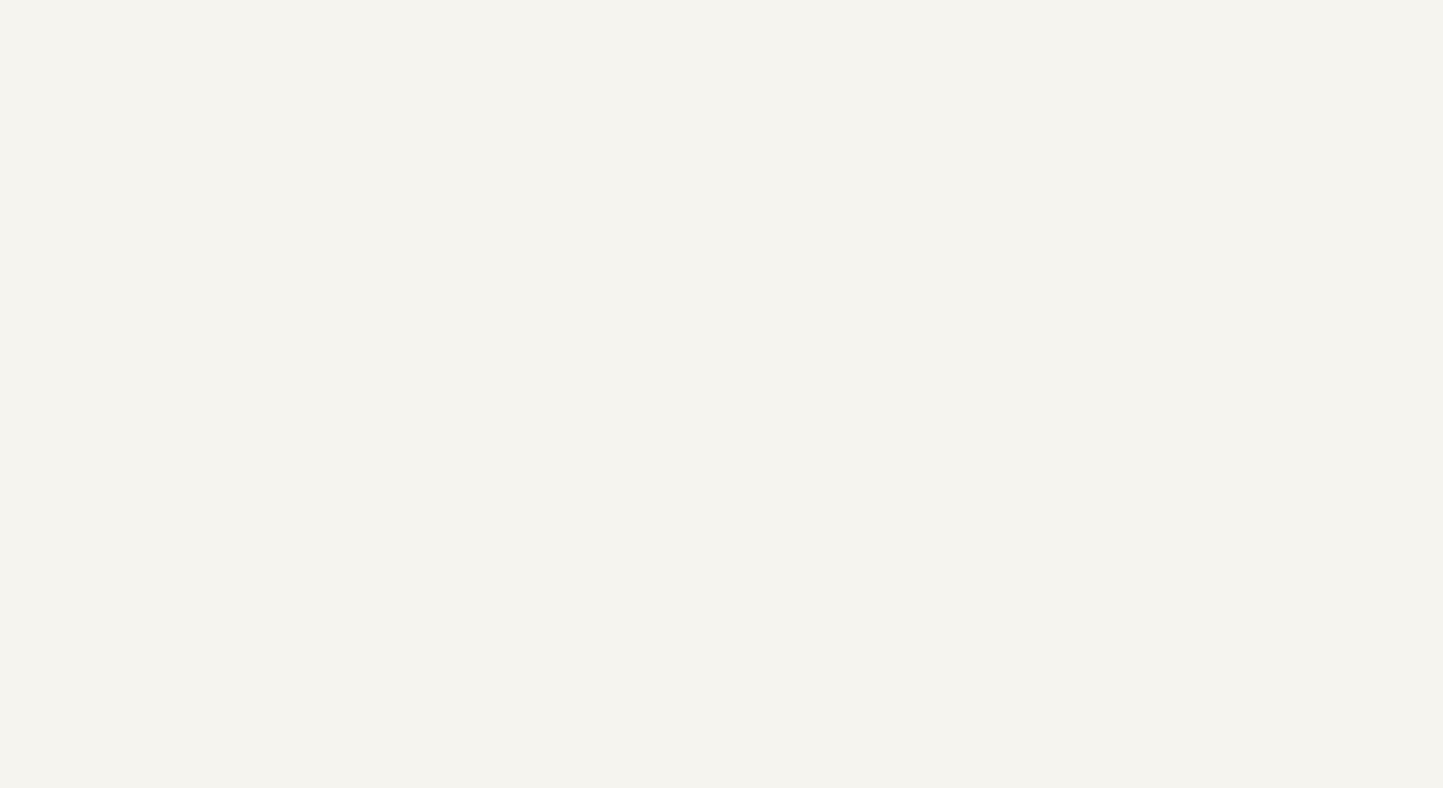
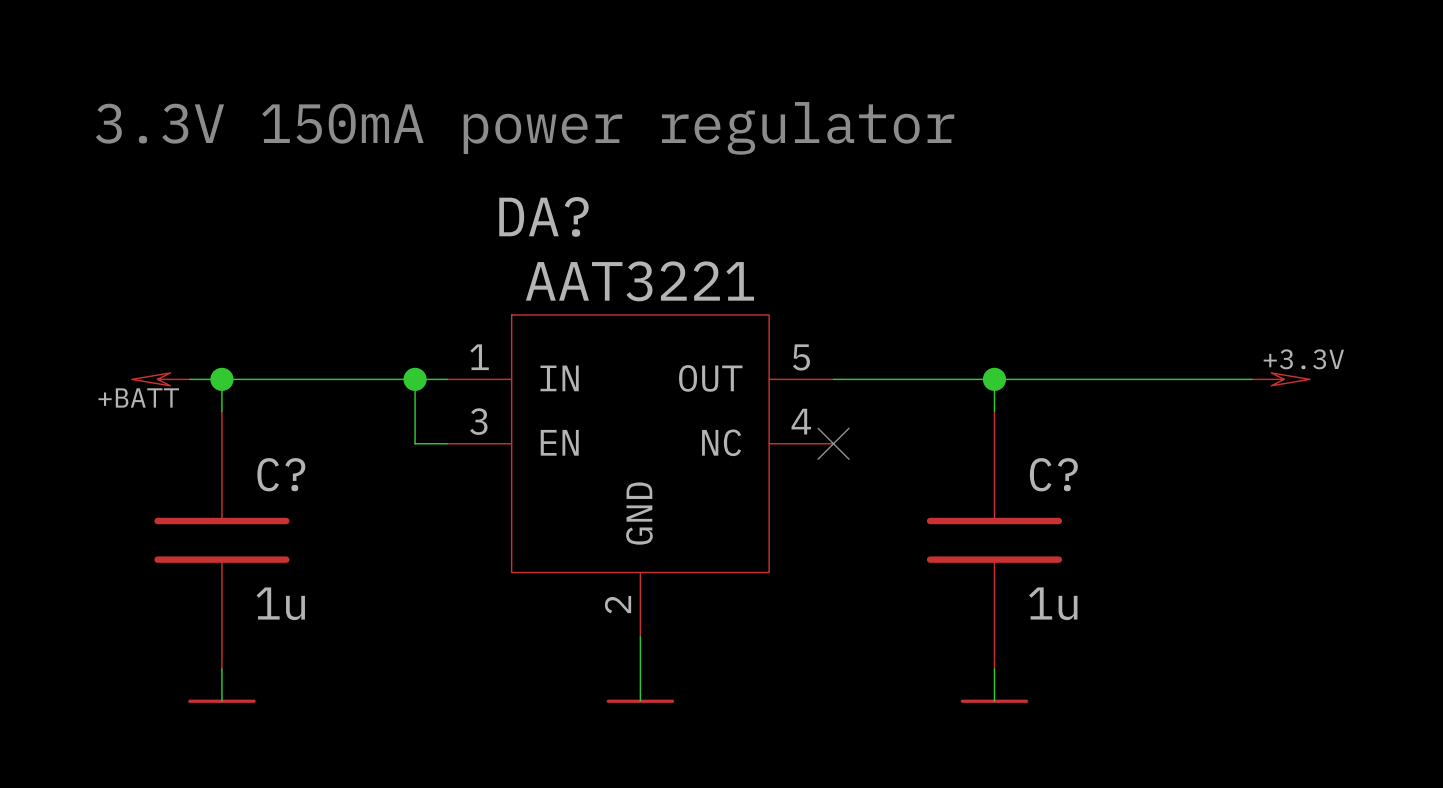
text: none -> 3.3V 150mA power regulator (525, 128)
power symbol: none -> +BATT (160, 379)
wire: none -> (189, 379) (447, 379)
wire: none -> (221, 379) (221, 411)
junction: none -> (221, 379)
wire: none -> (415, 379) (415, 443) (447, 443)
junction: none -> (415, 379)
wire: none -> (833, 379) (1251, 379)
wire: none -> (994, 379) (994, 411)
junction: none -> (994, 379)
power symbol: none -> +3.3V (1280, 379)
no-connect mark: none -> (833, 443)
DA?: none -> AAT3221 (640, 475)
C?: none -> 1u (221, 540)
C?: none -> 1u (994, 540)
wire: none -> (640, 636) (640, 701)
wire: none -> (221, 669) (221, 701)
wire: none -> (994, 669) (994, 701)
power symbol: none -> (221, 701)
power symbol: none -> (640, 701)
power symbol: none -> (994, 701)

